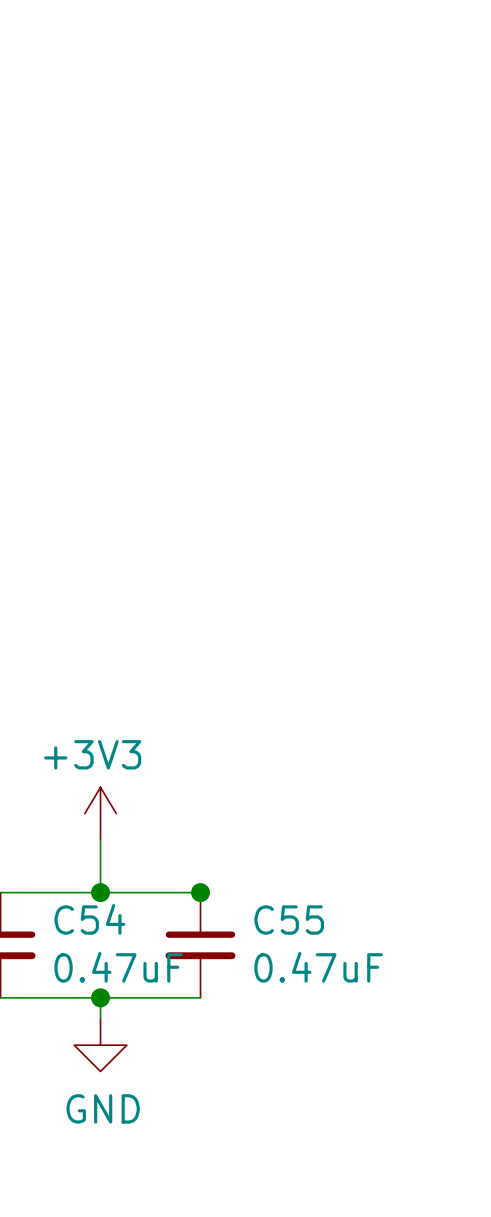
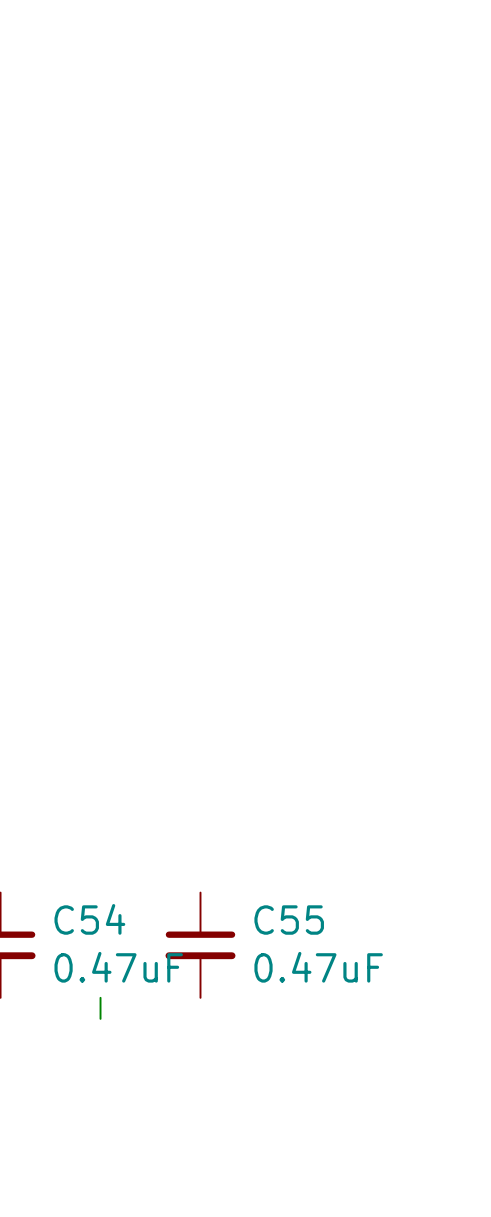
power symbol: +3V3 (100, 813) -> none
wire: (100, 839) (100, 892) -> none
wire: (0, 892) (200, 892) (200, 897) -> none
junction: (100, 892) -> none
junction: (200, 892) -> none
wire: (0, 997) (200, 997) -> none
junction: (100, 997) -> none
power symbol: GND (100, 1045) -> none

